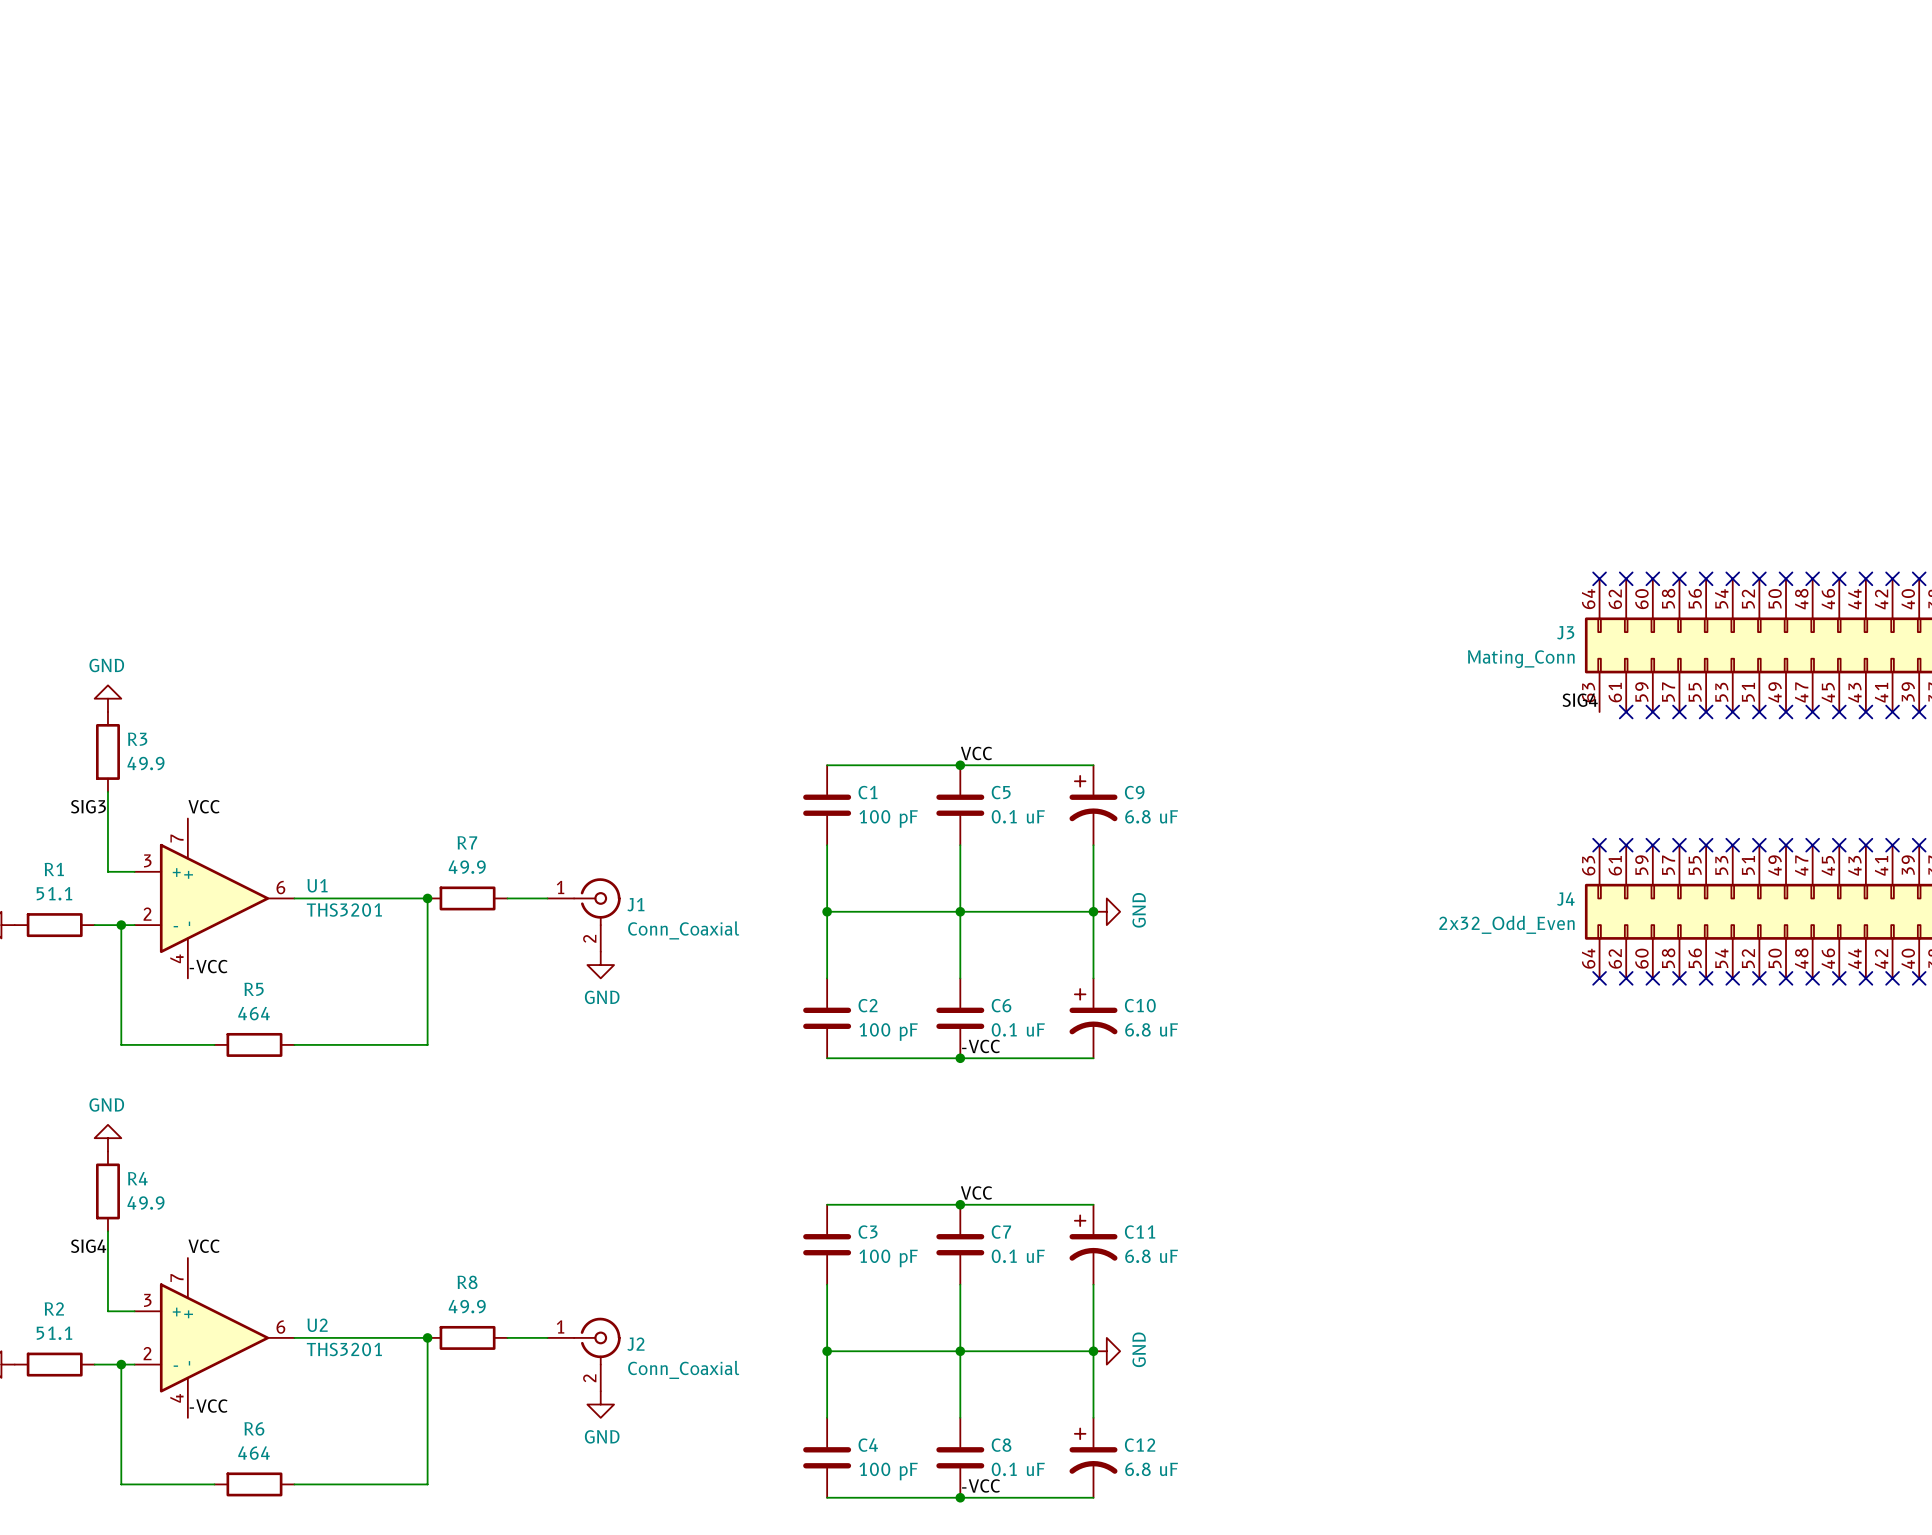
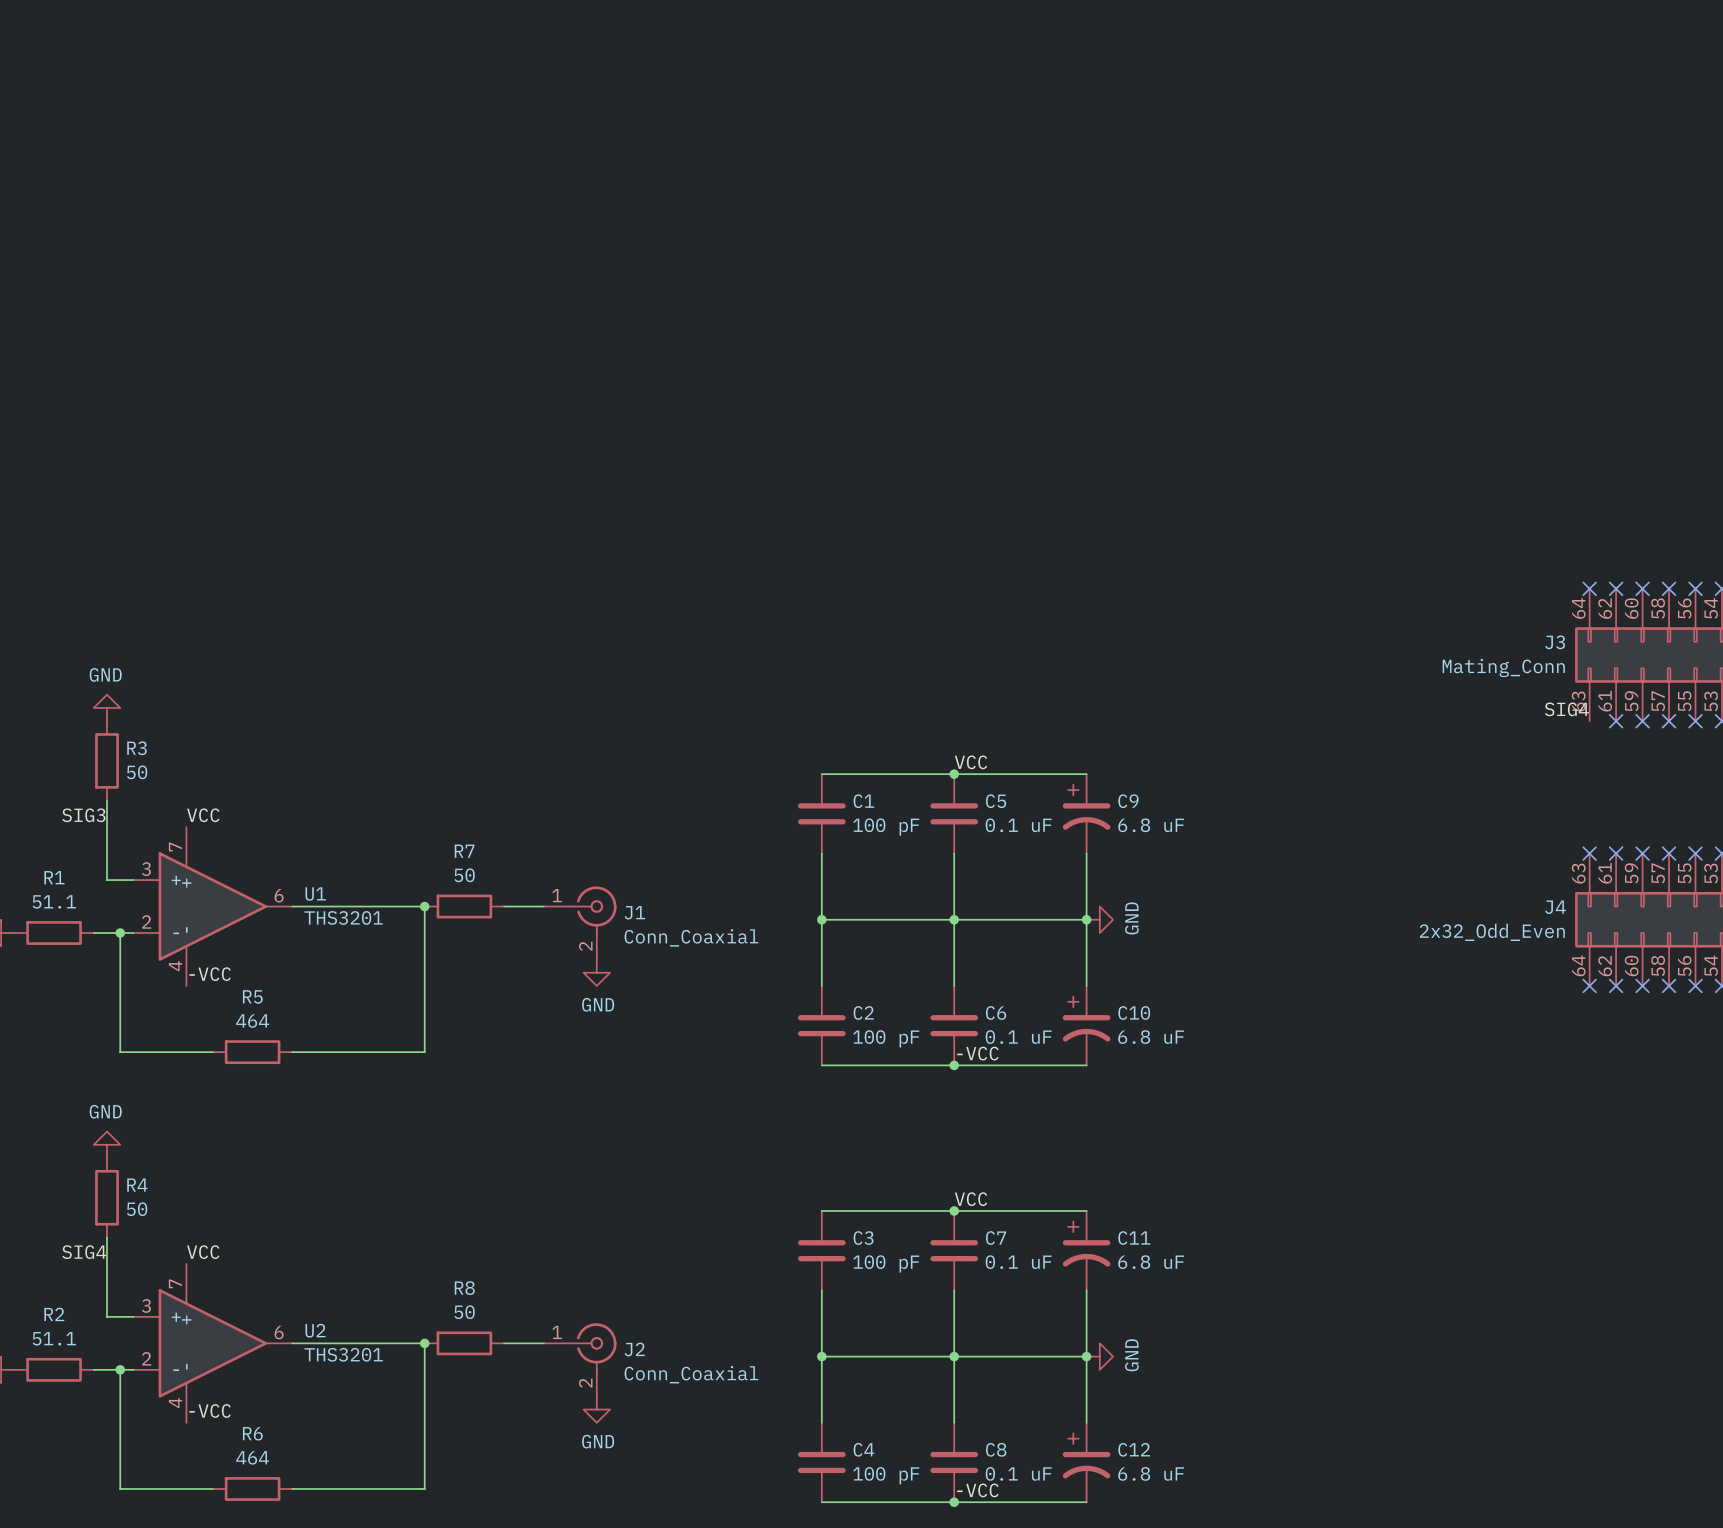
R3 value: 49.9 (145, 763) -> 50 (137, 772)
R7 value: 49.9 (467, 867) -> 50 (464, 875)
R4 value: 49.9 (145, 1203) -> 50 (137, 1209)
R8 value: 49.9 (467, 1306) -> 50 (464, 1312)

